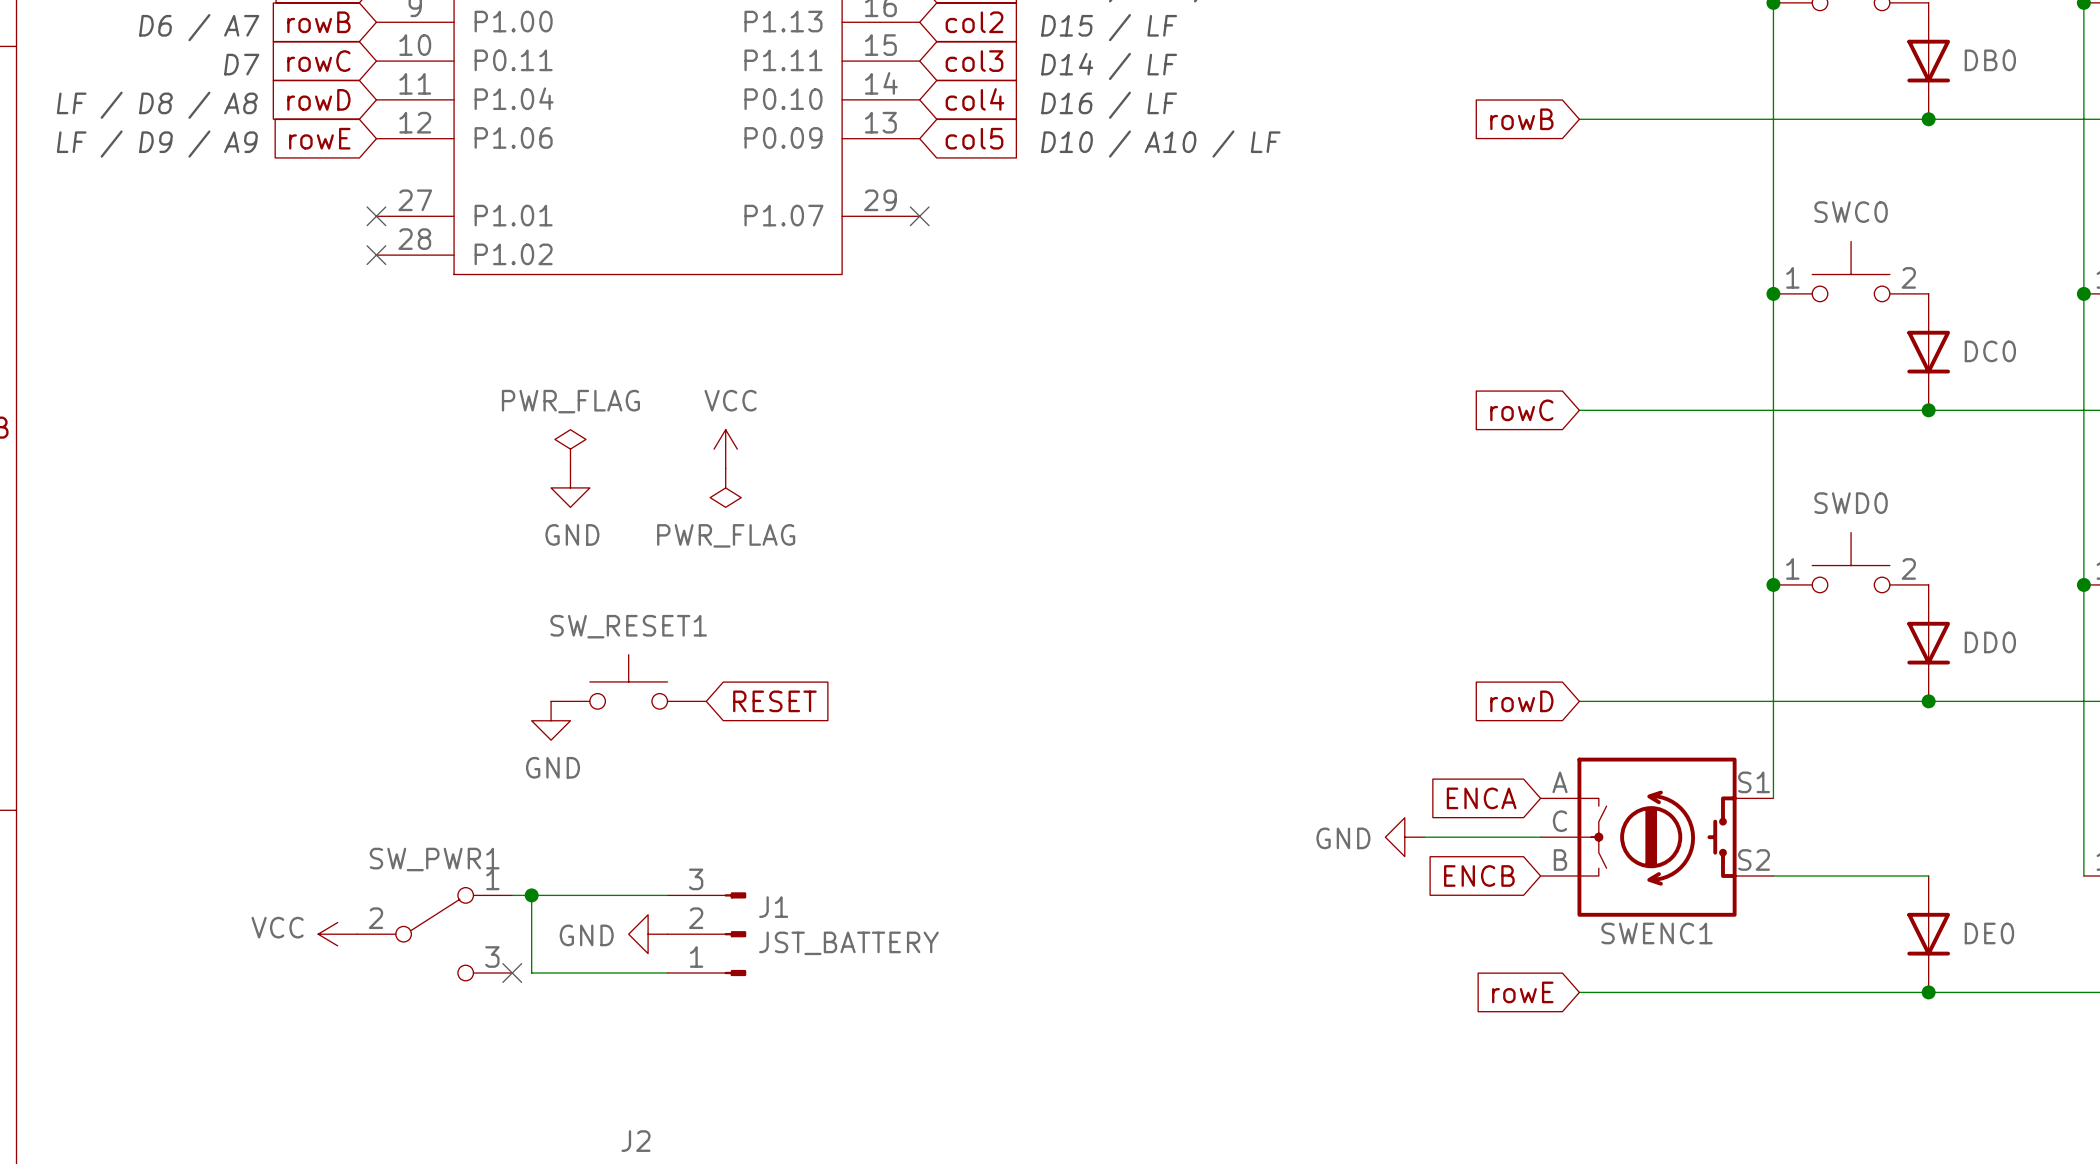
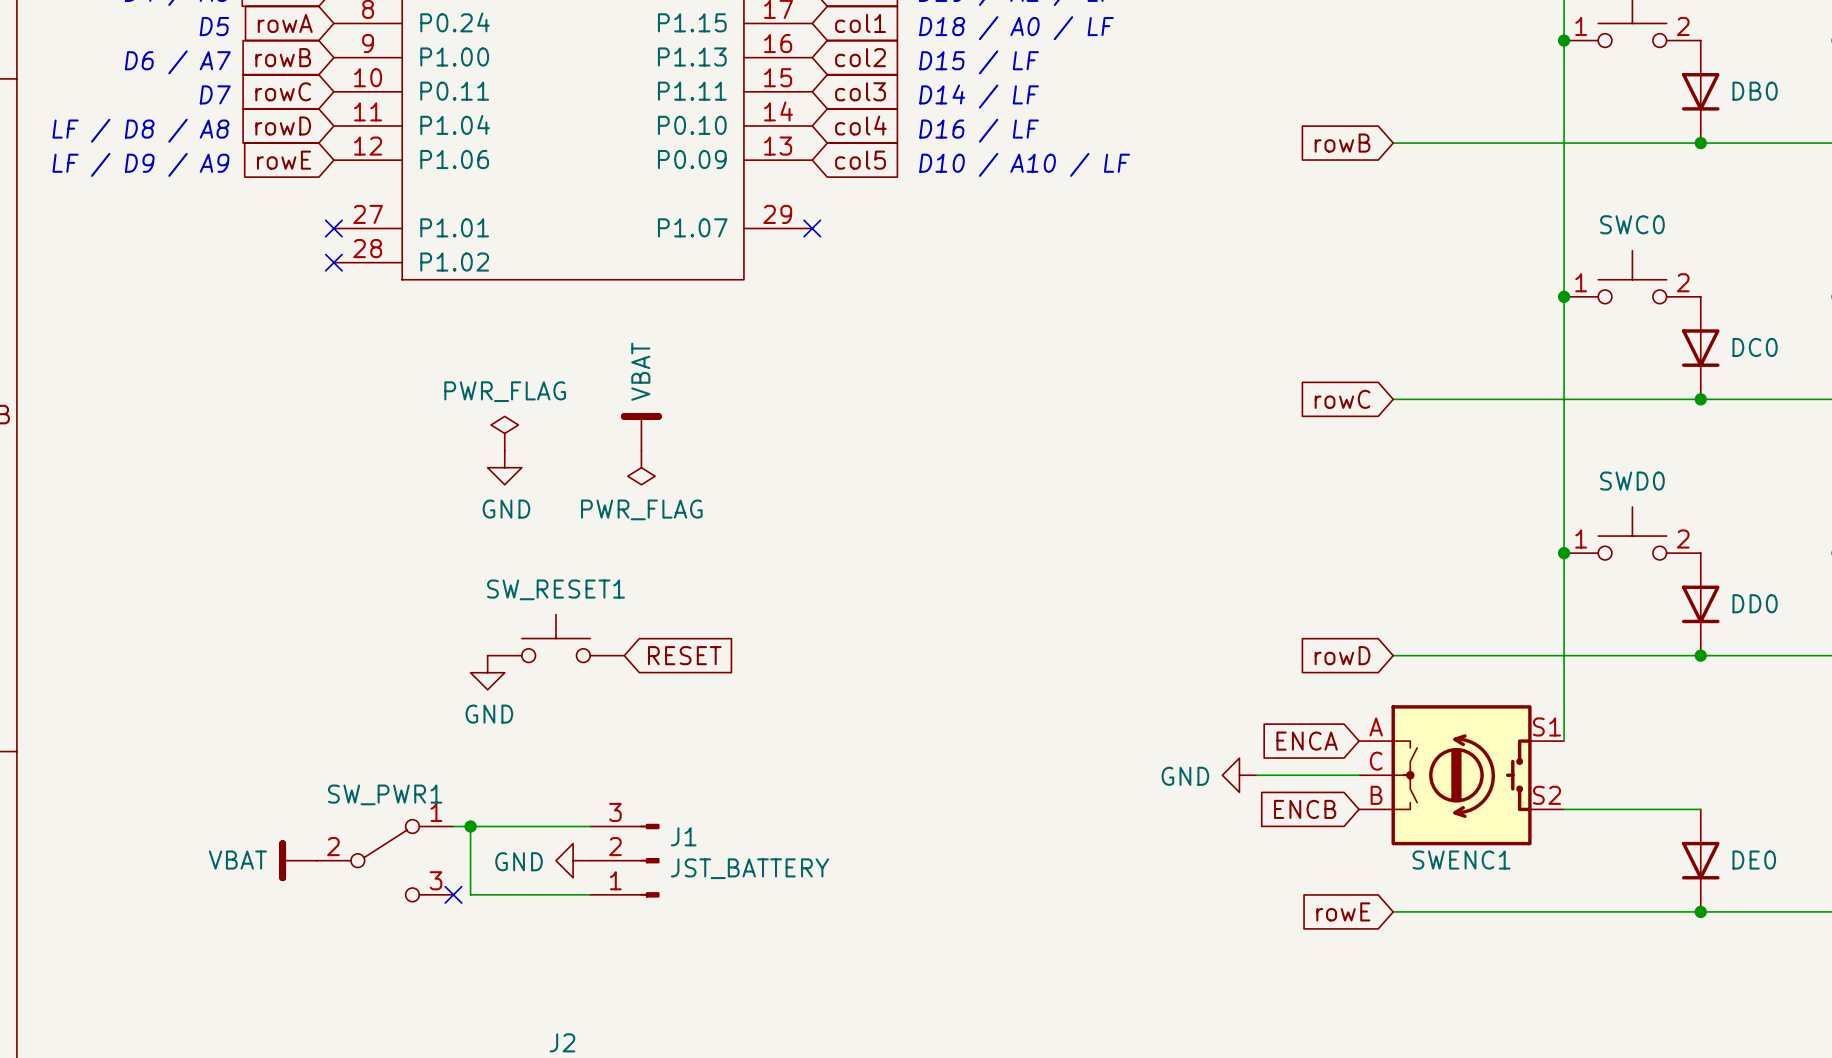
power symbol text: VCC (730, 400) -> none
power symbol shape: [714, 429, 738, 469] -> [620, 413, 662, 451]
power symbol shape: [318, 922, 358, 946] -> [279, 840, 317, 882]
power symbol text: VCC (277, 927) -> none

